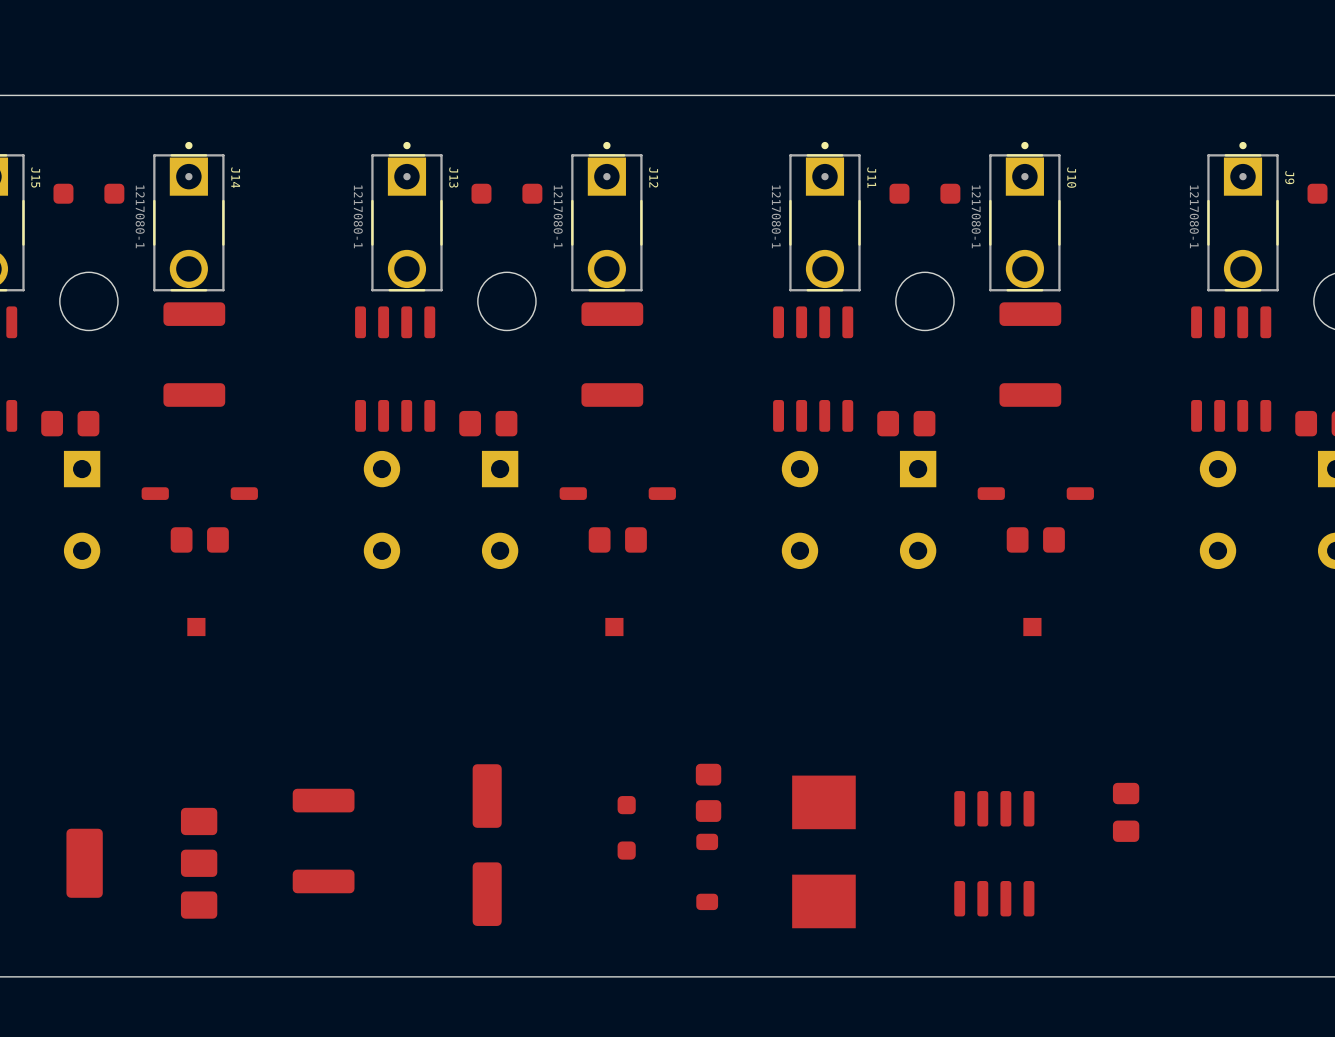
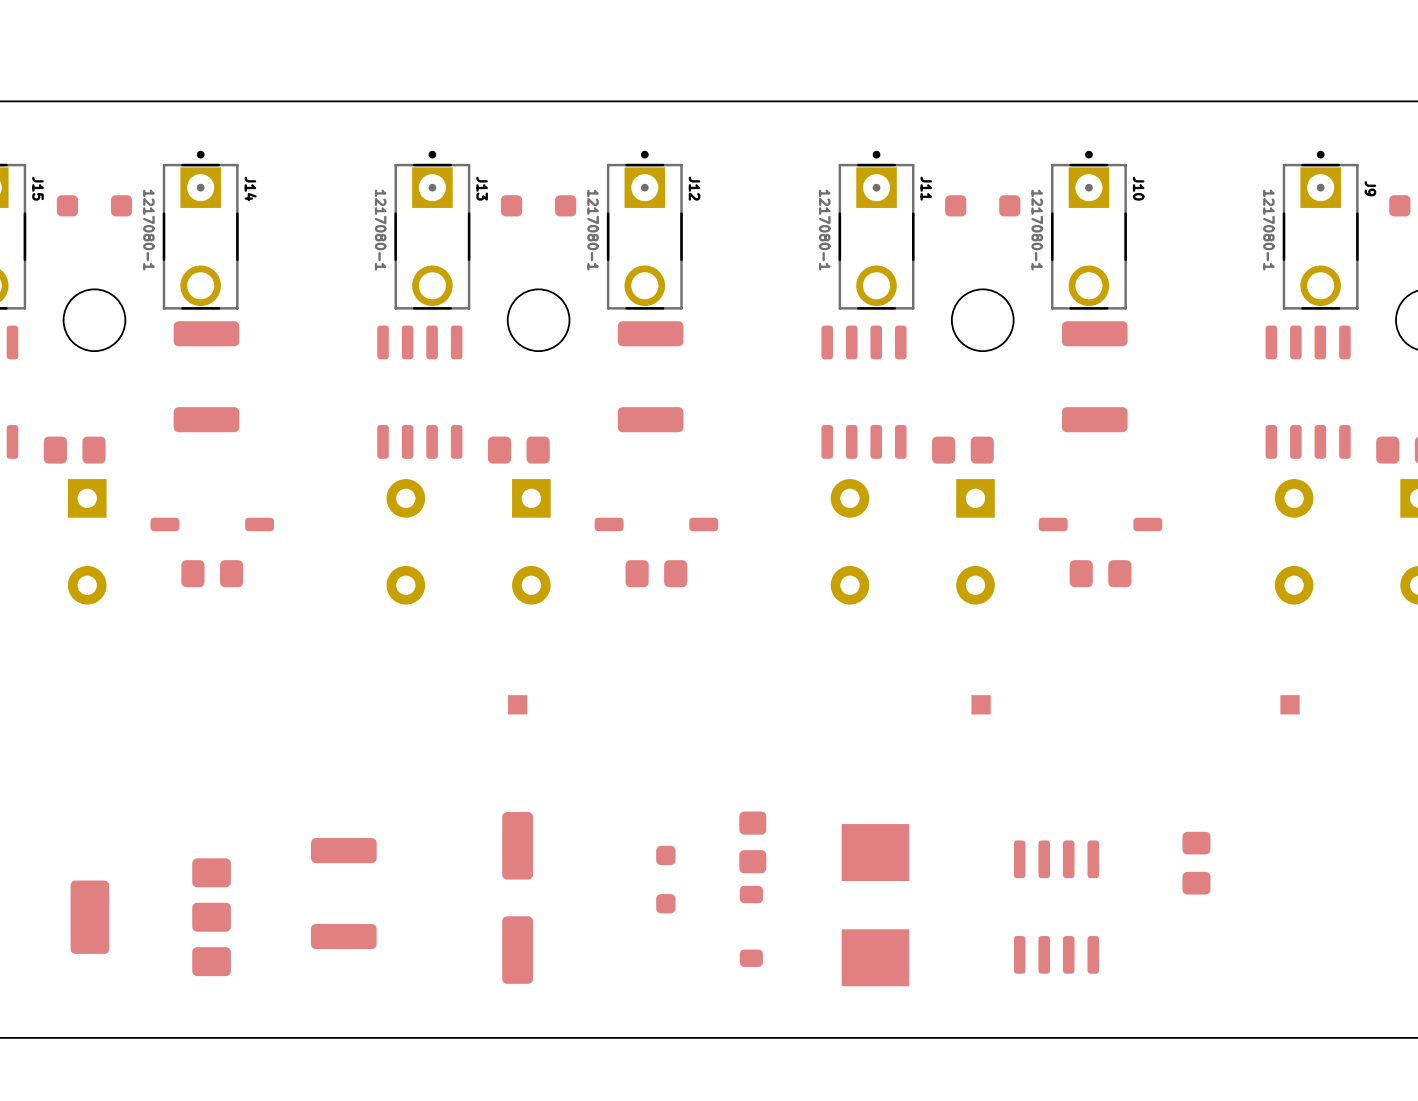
part: (196, 627) -> none
part position: (614, 627) -> (517, 704)
part: (1032, 627) -> none
part: none -> (981, 704)
part: none -> (1290, 704)

